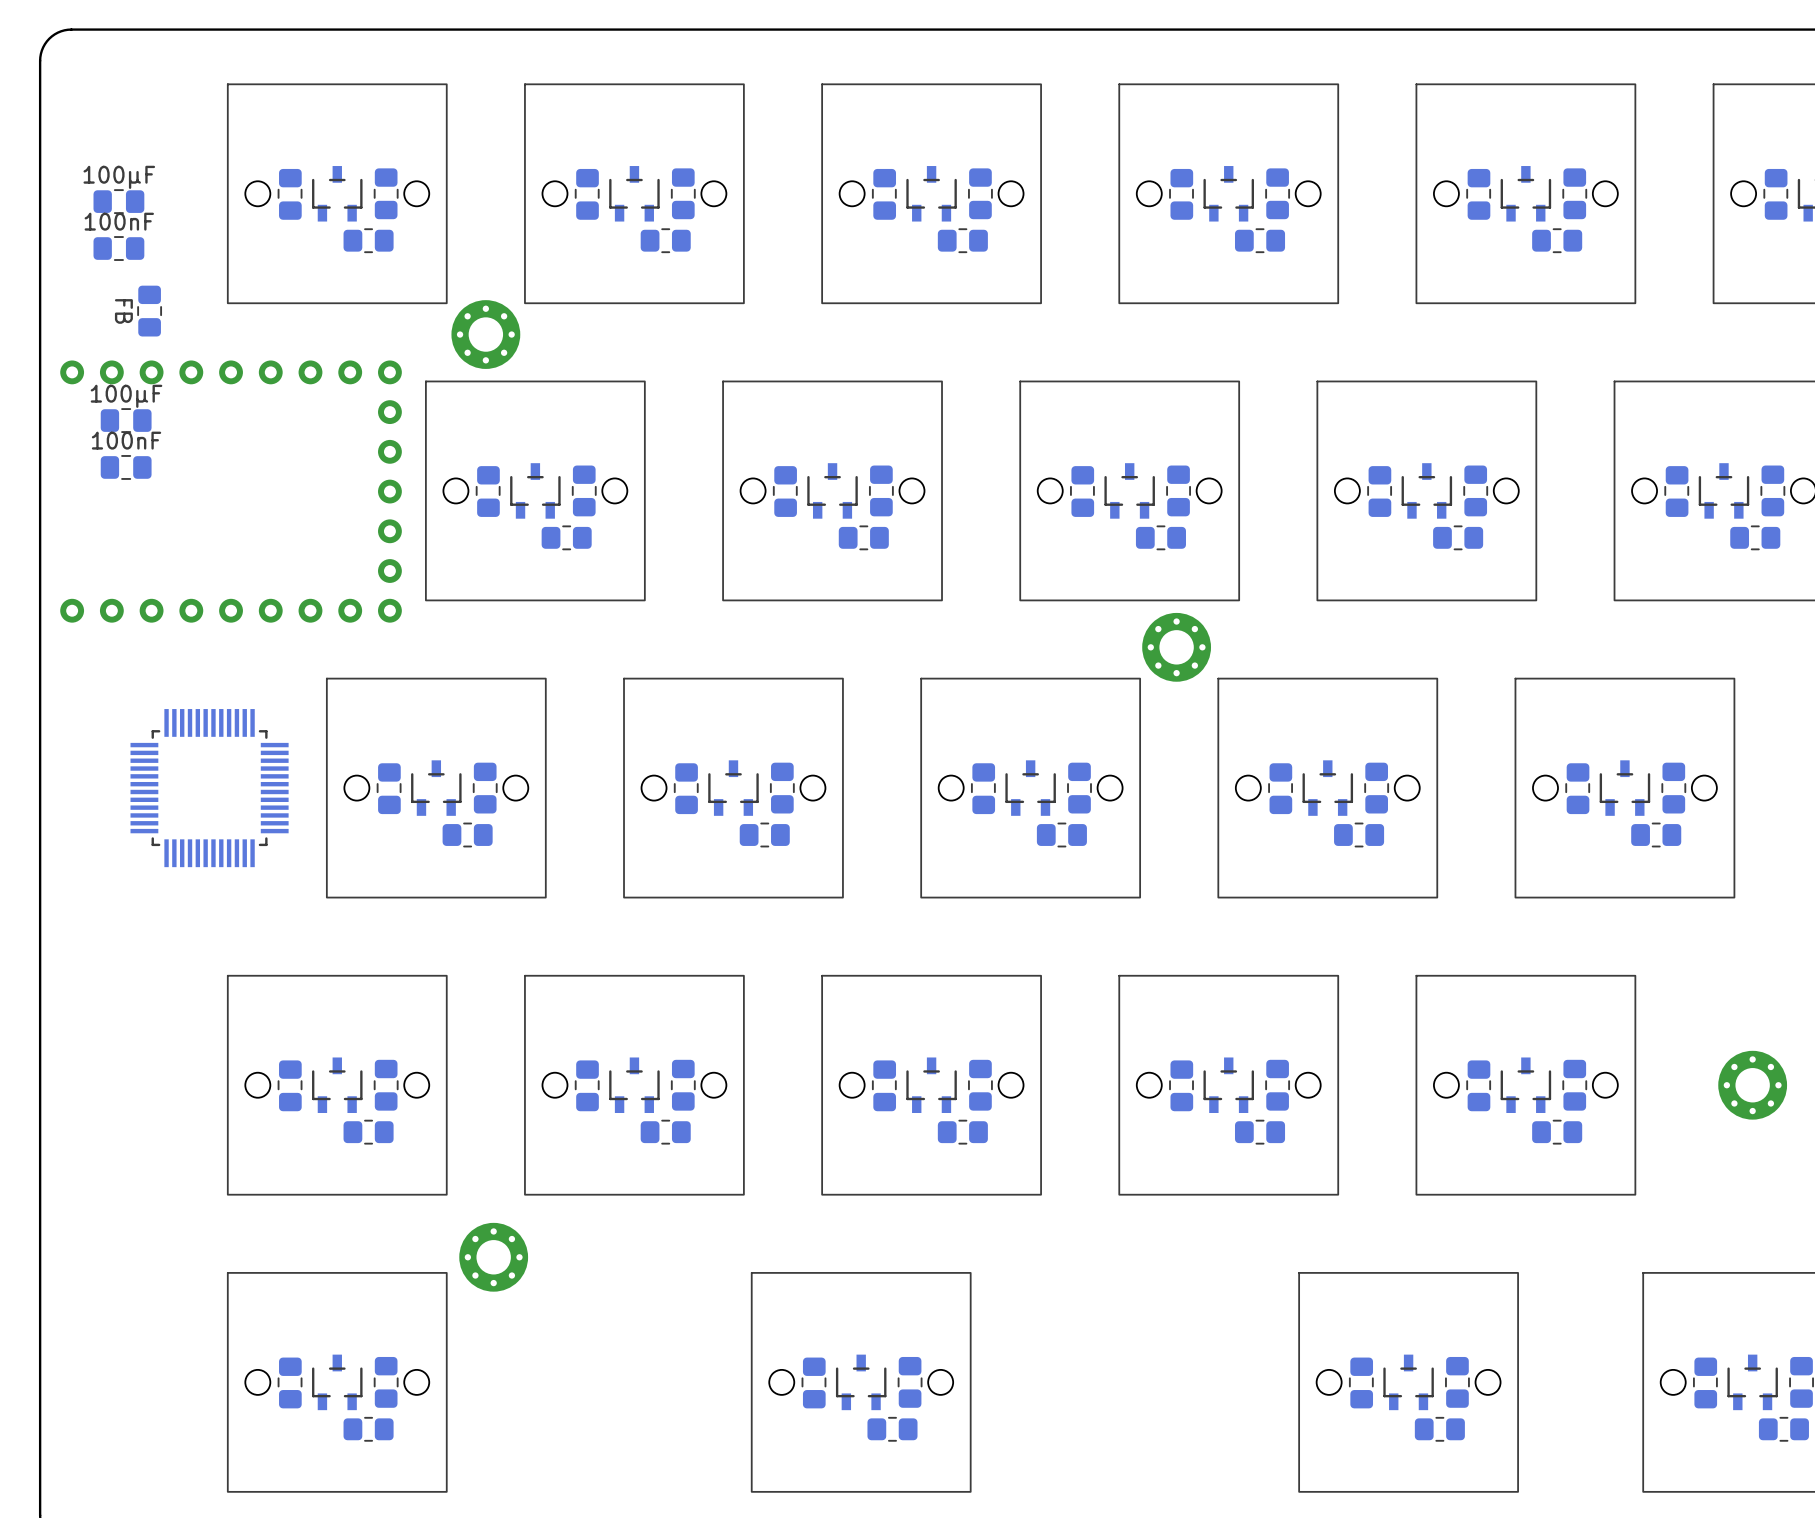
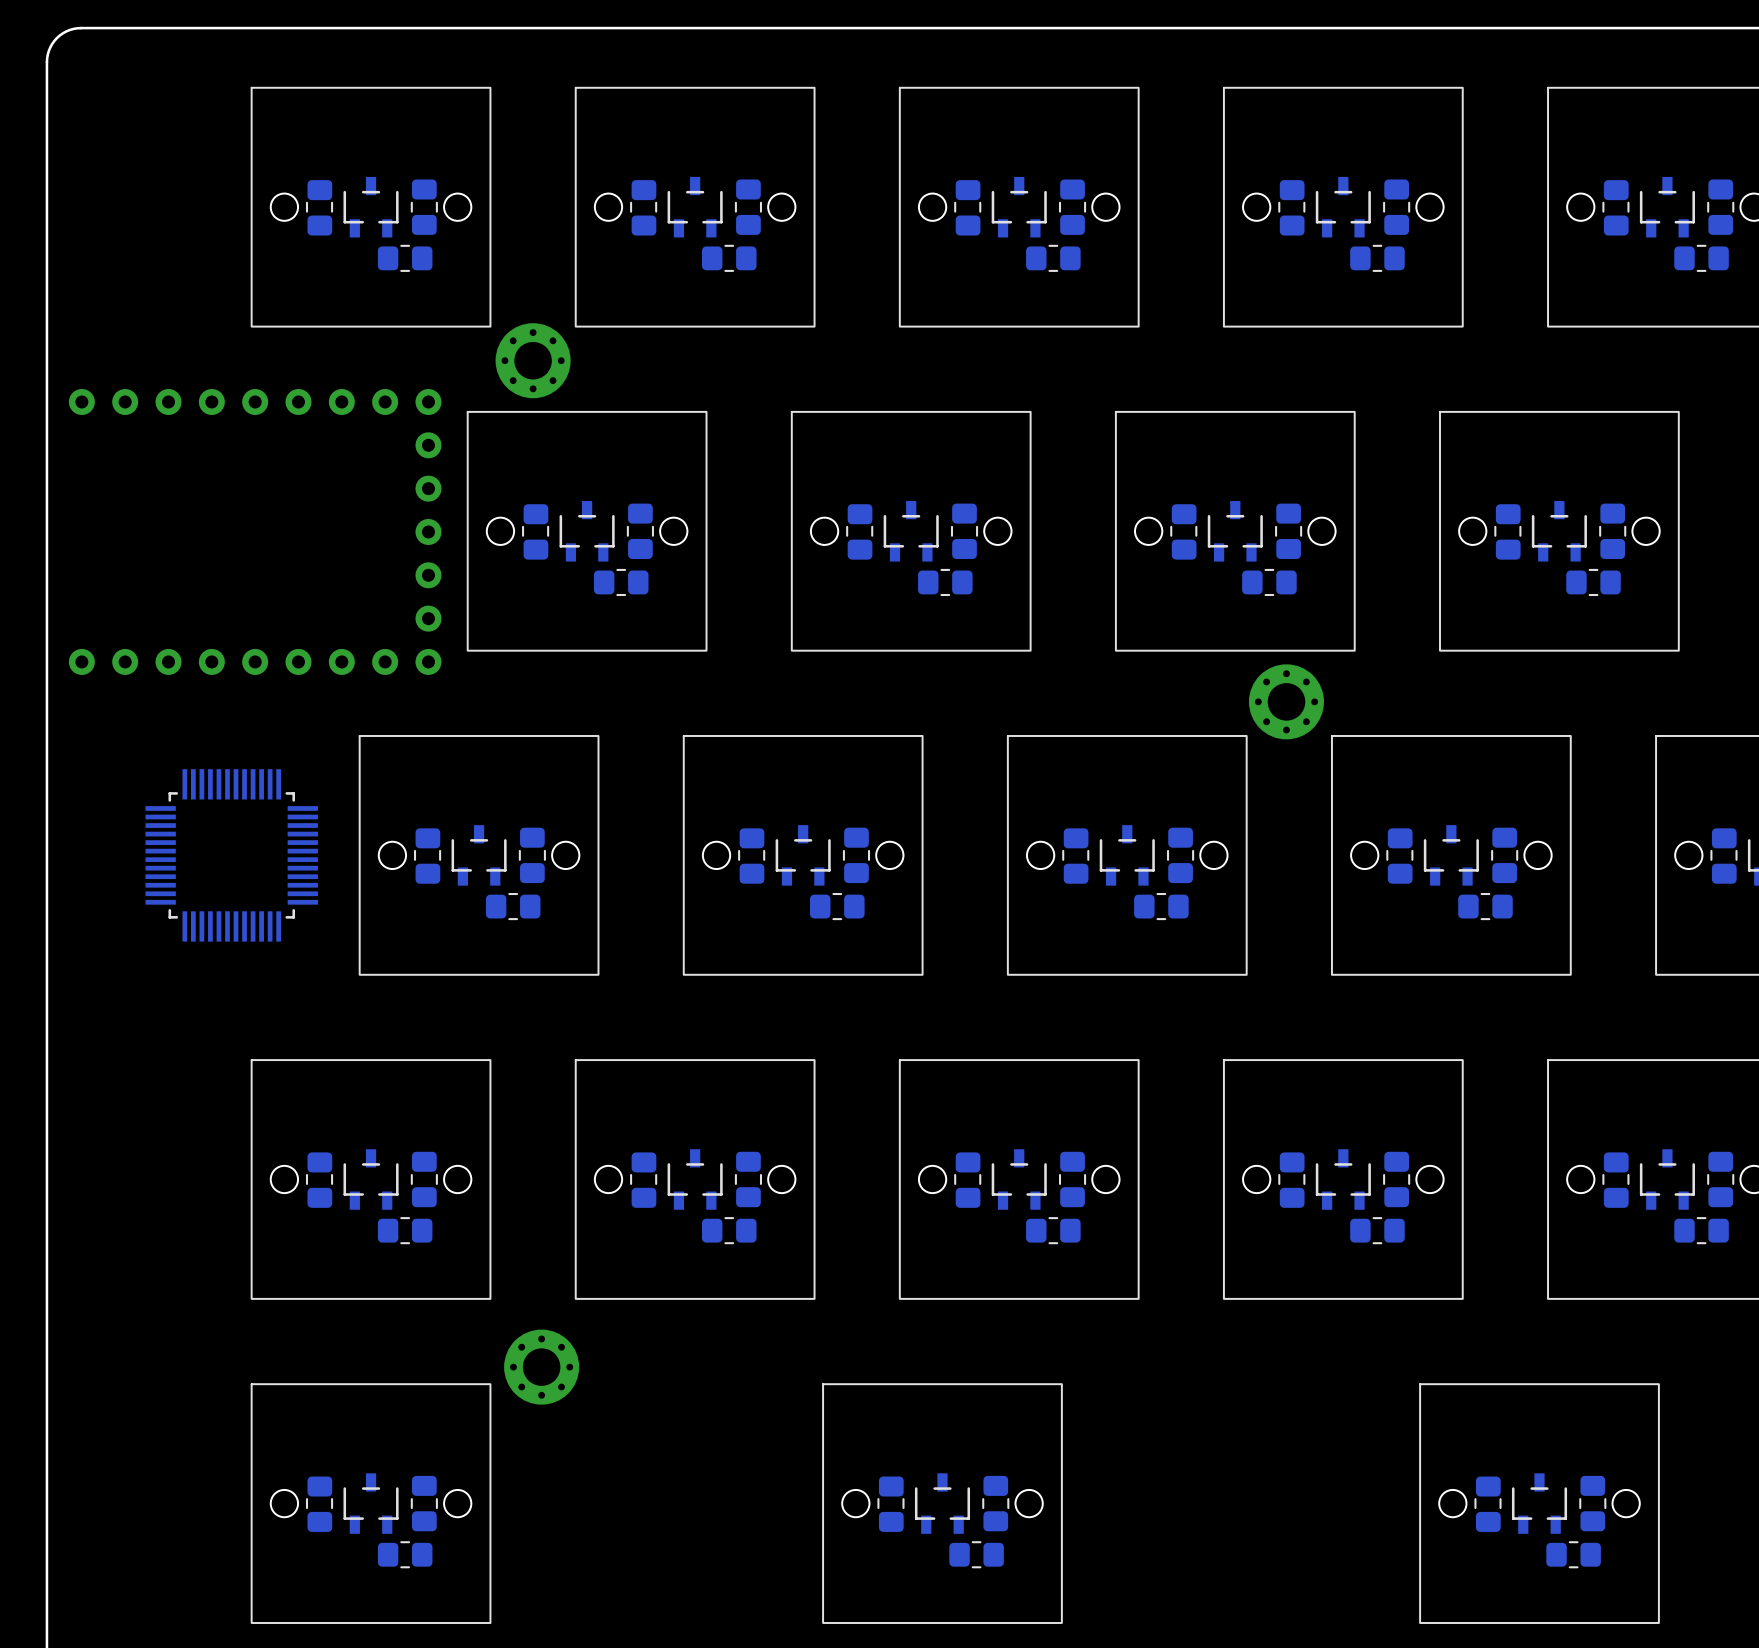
100µF: (118, 201) -> none
100nF: (118, 248) -> none
FB: (149, 311) -> none
100µF: (126, 420) -> none
100nF: (126, 467) -> none

